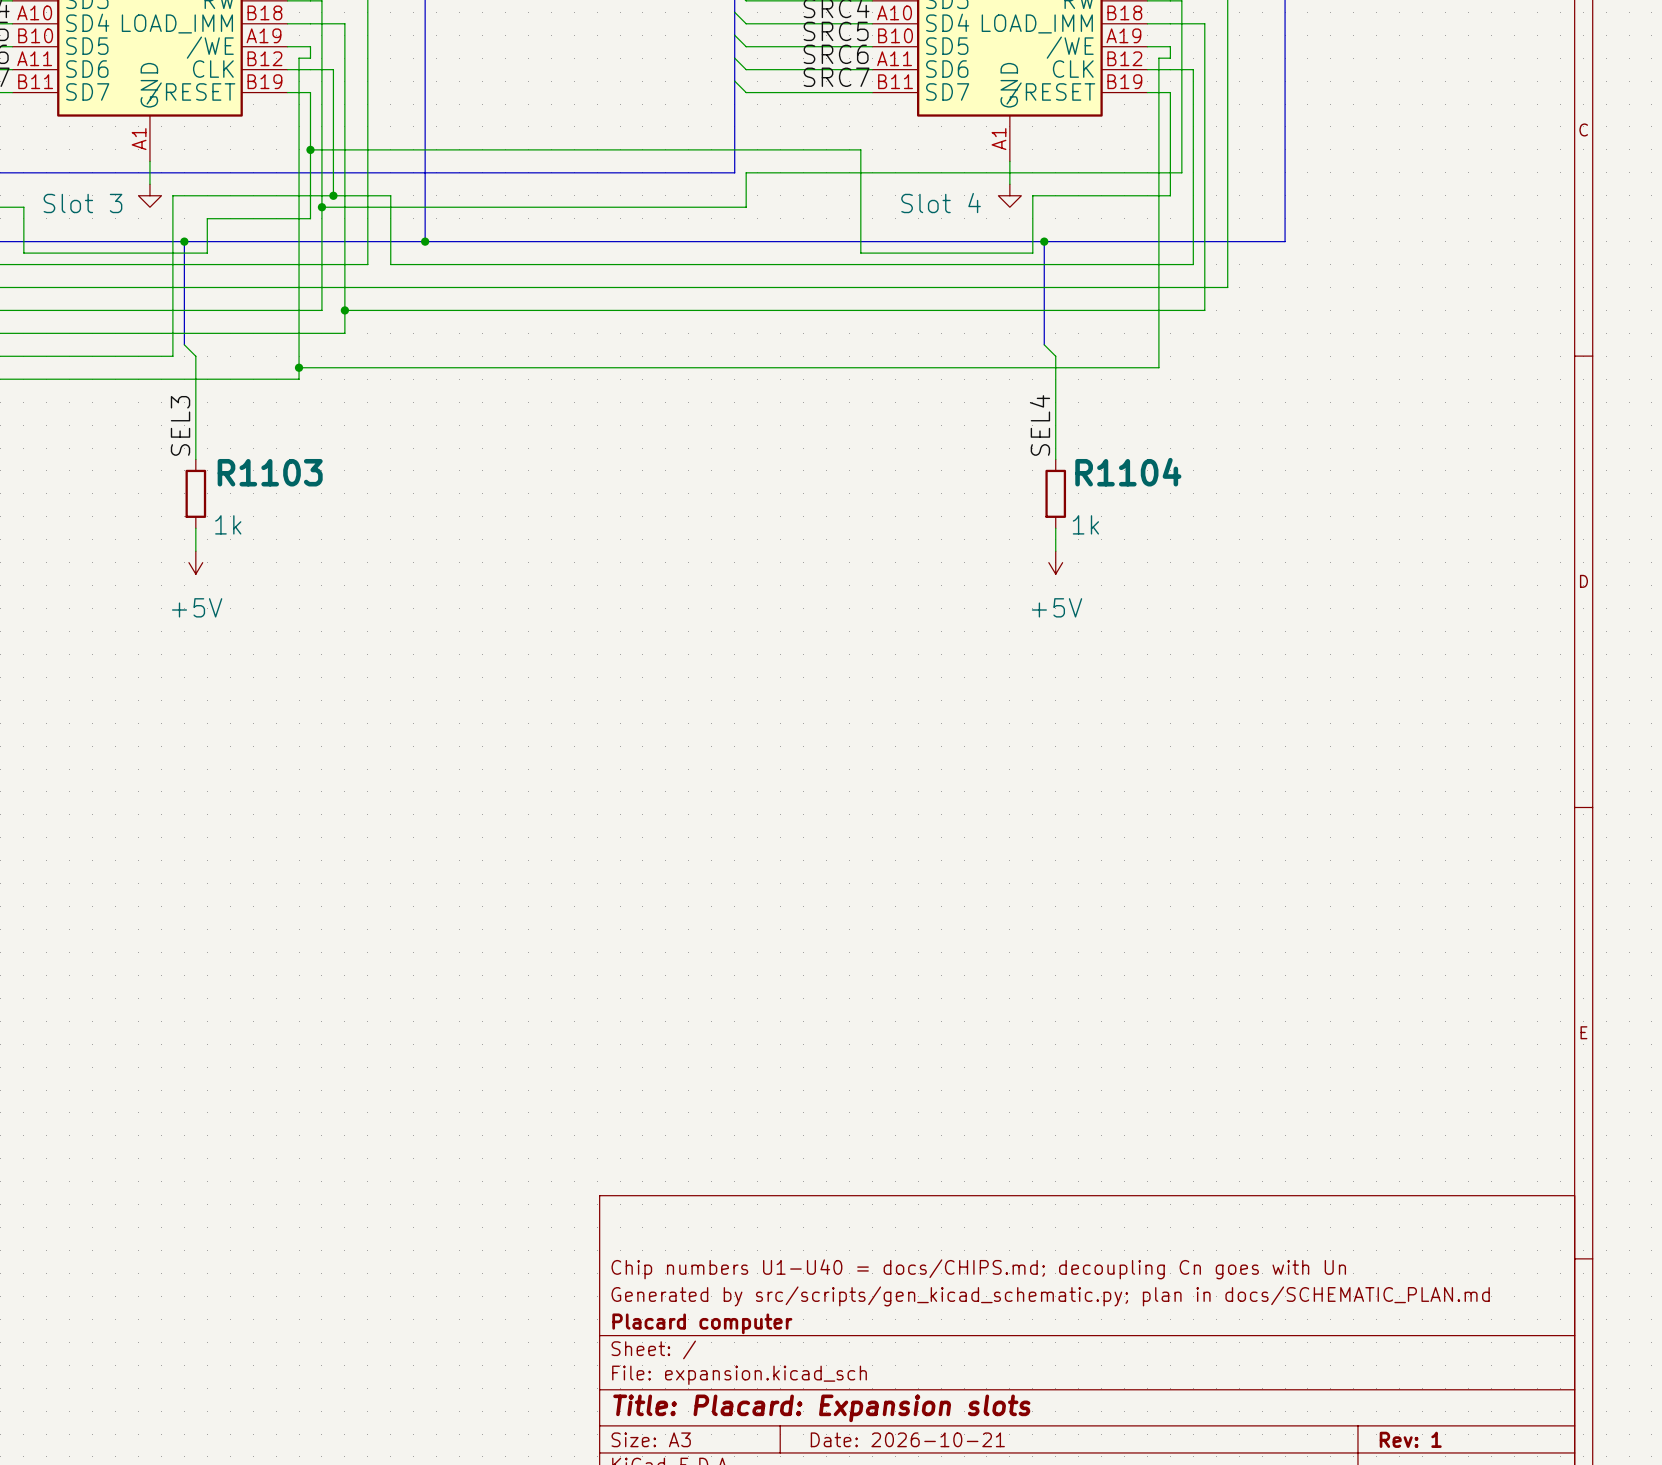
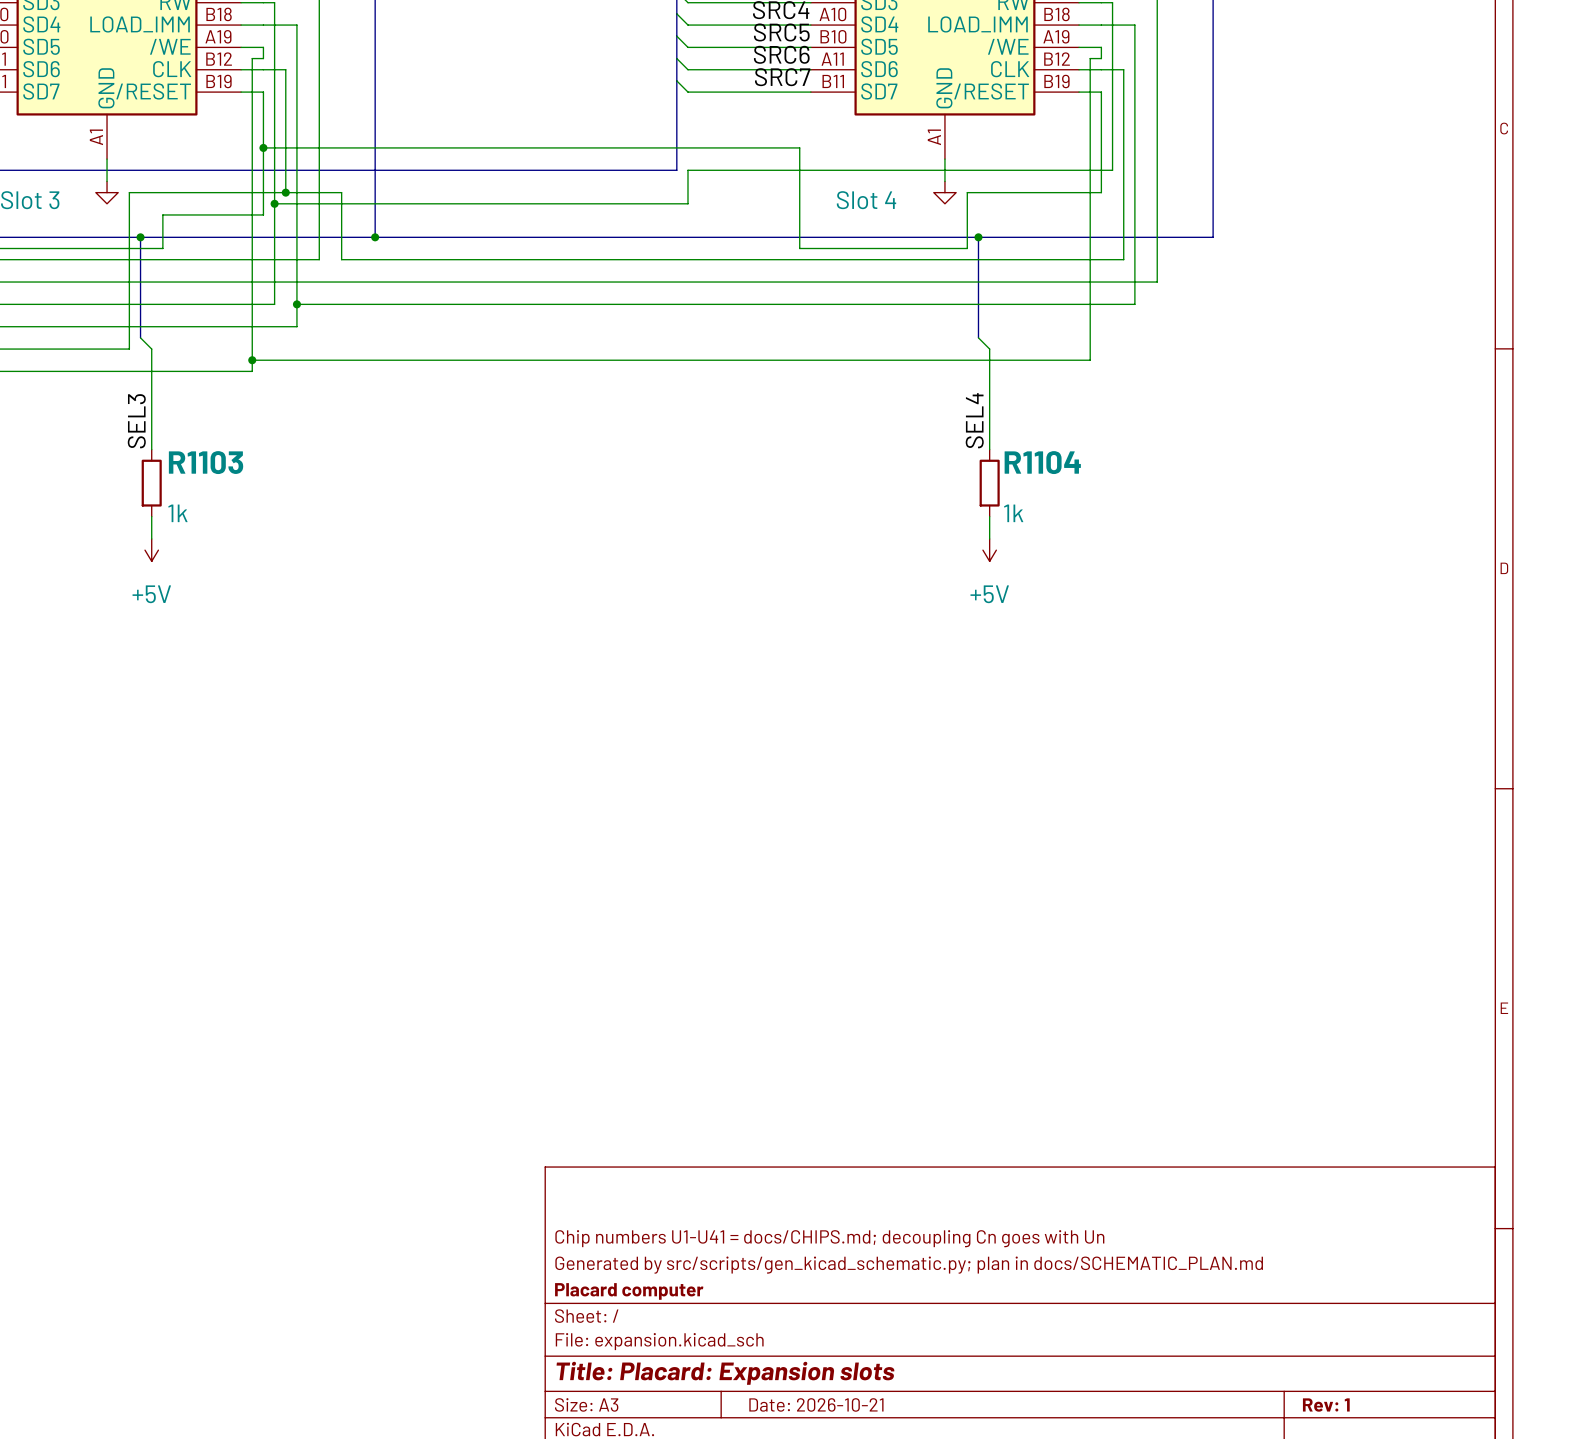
title block: Chip numbers U1-U40 = docs/CHIPS.md; decoupling Cn goes with Un (978, 1269) -> Chip numbers U1-U41 = docs/CHIPS.md; decoupling Cn goes with Un (829, 1238)

